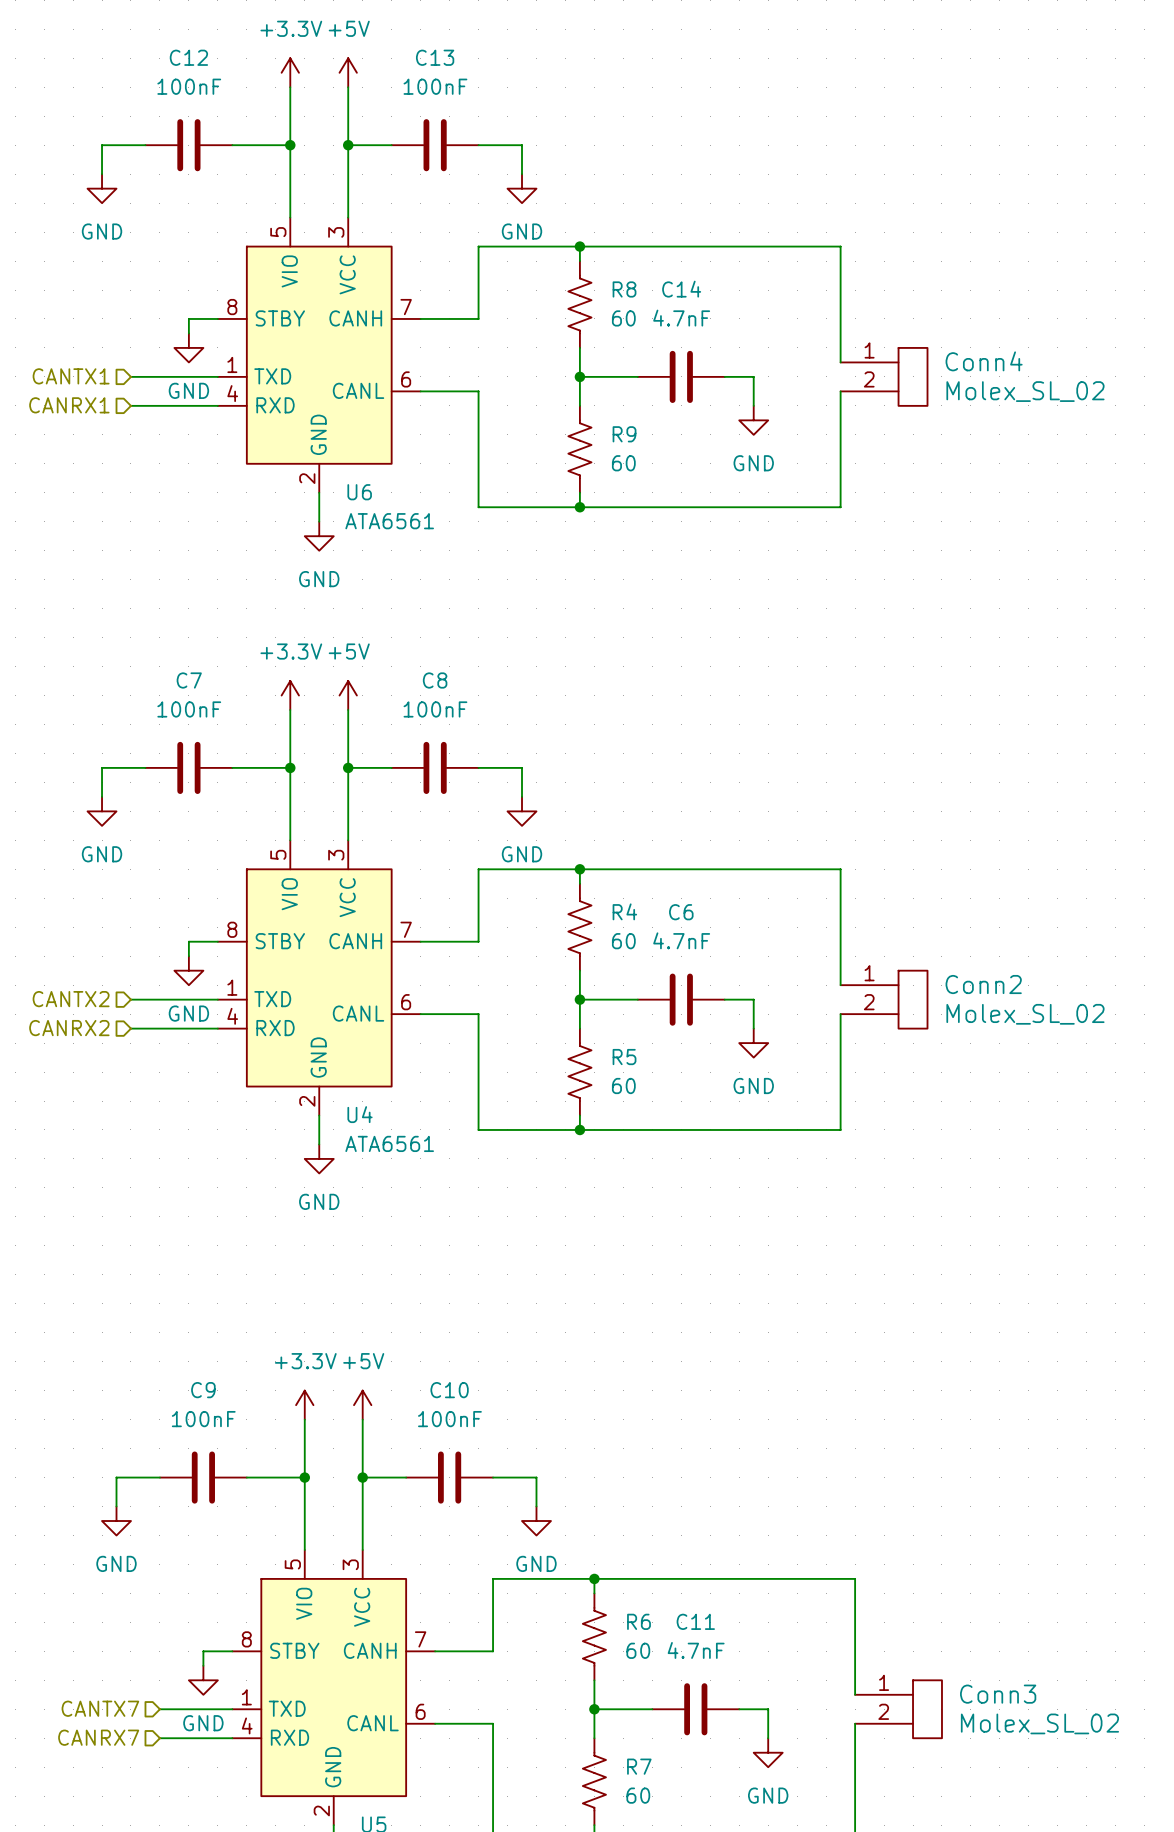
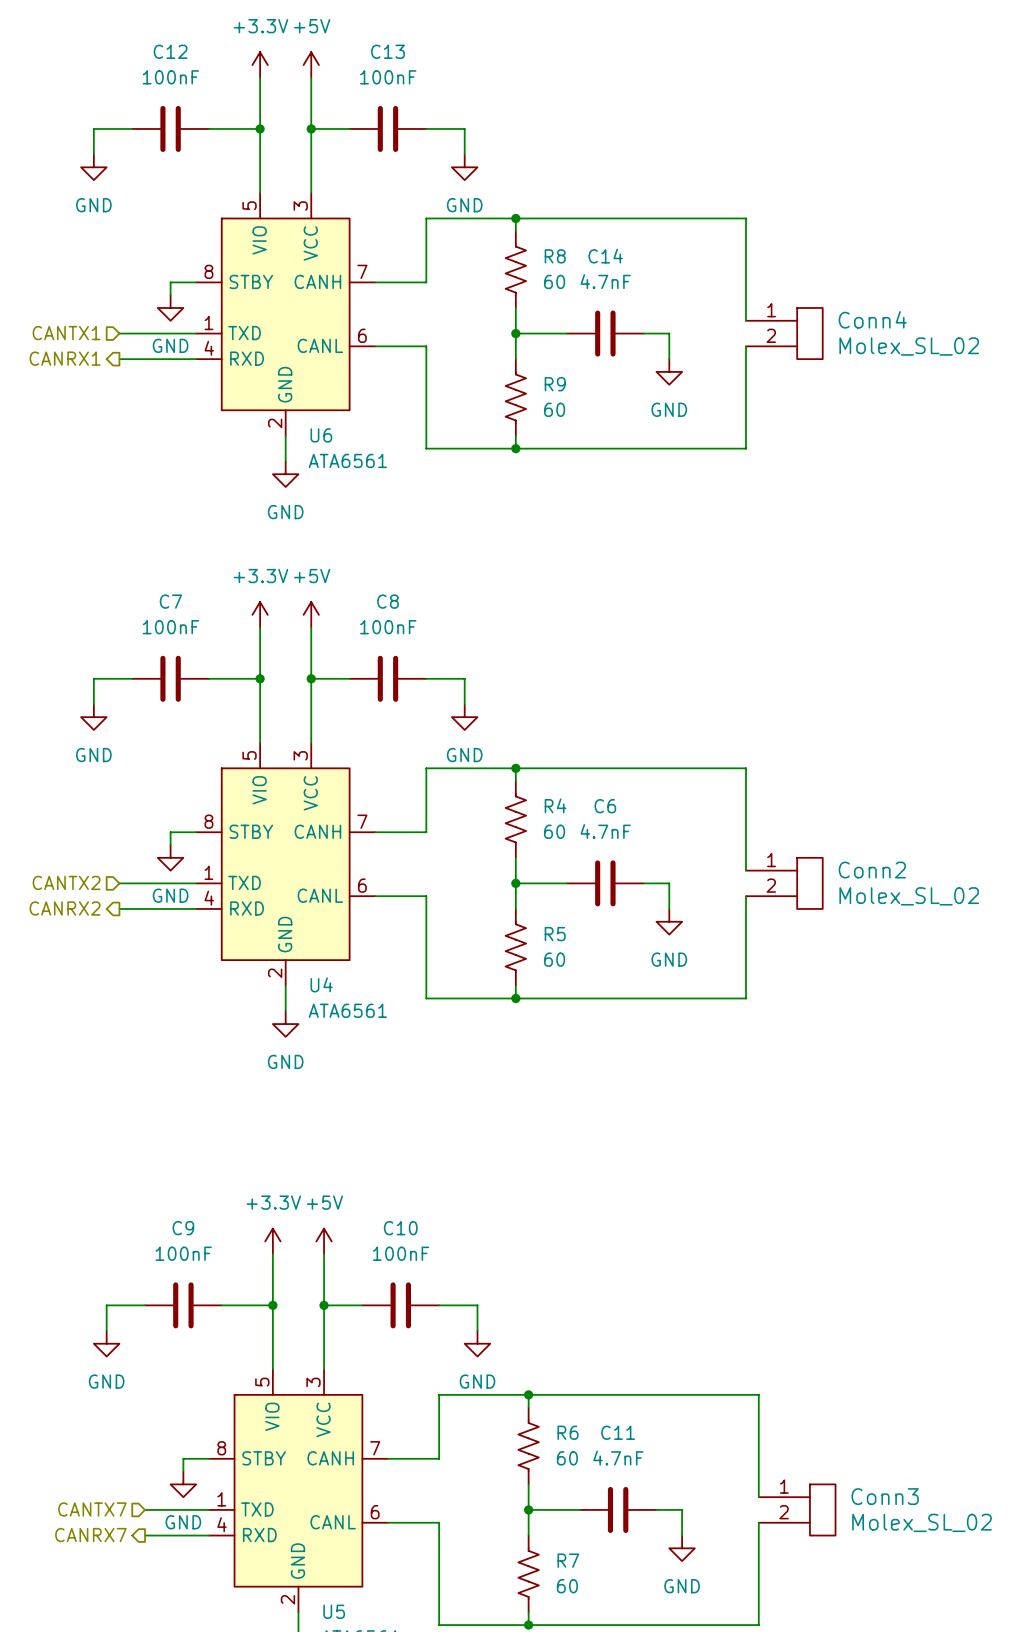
hierarchical label shape: input (69, 405) -> output (65, 358)
hierarchical label shape: input (69, 1028) -> output (65, 908)
hierarchical label shape: input (98, 1737) -> output (90, 1535)

